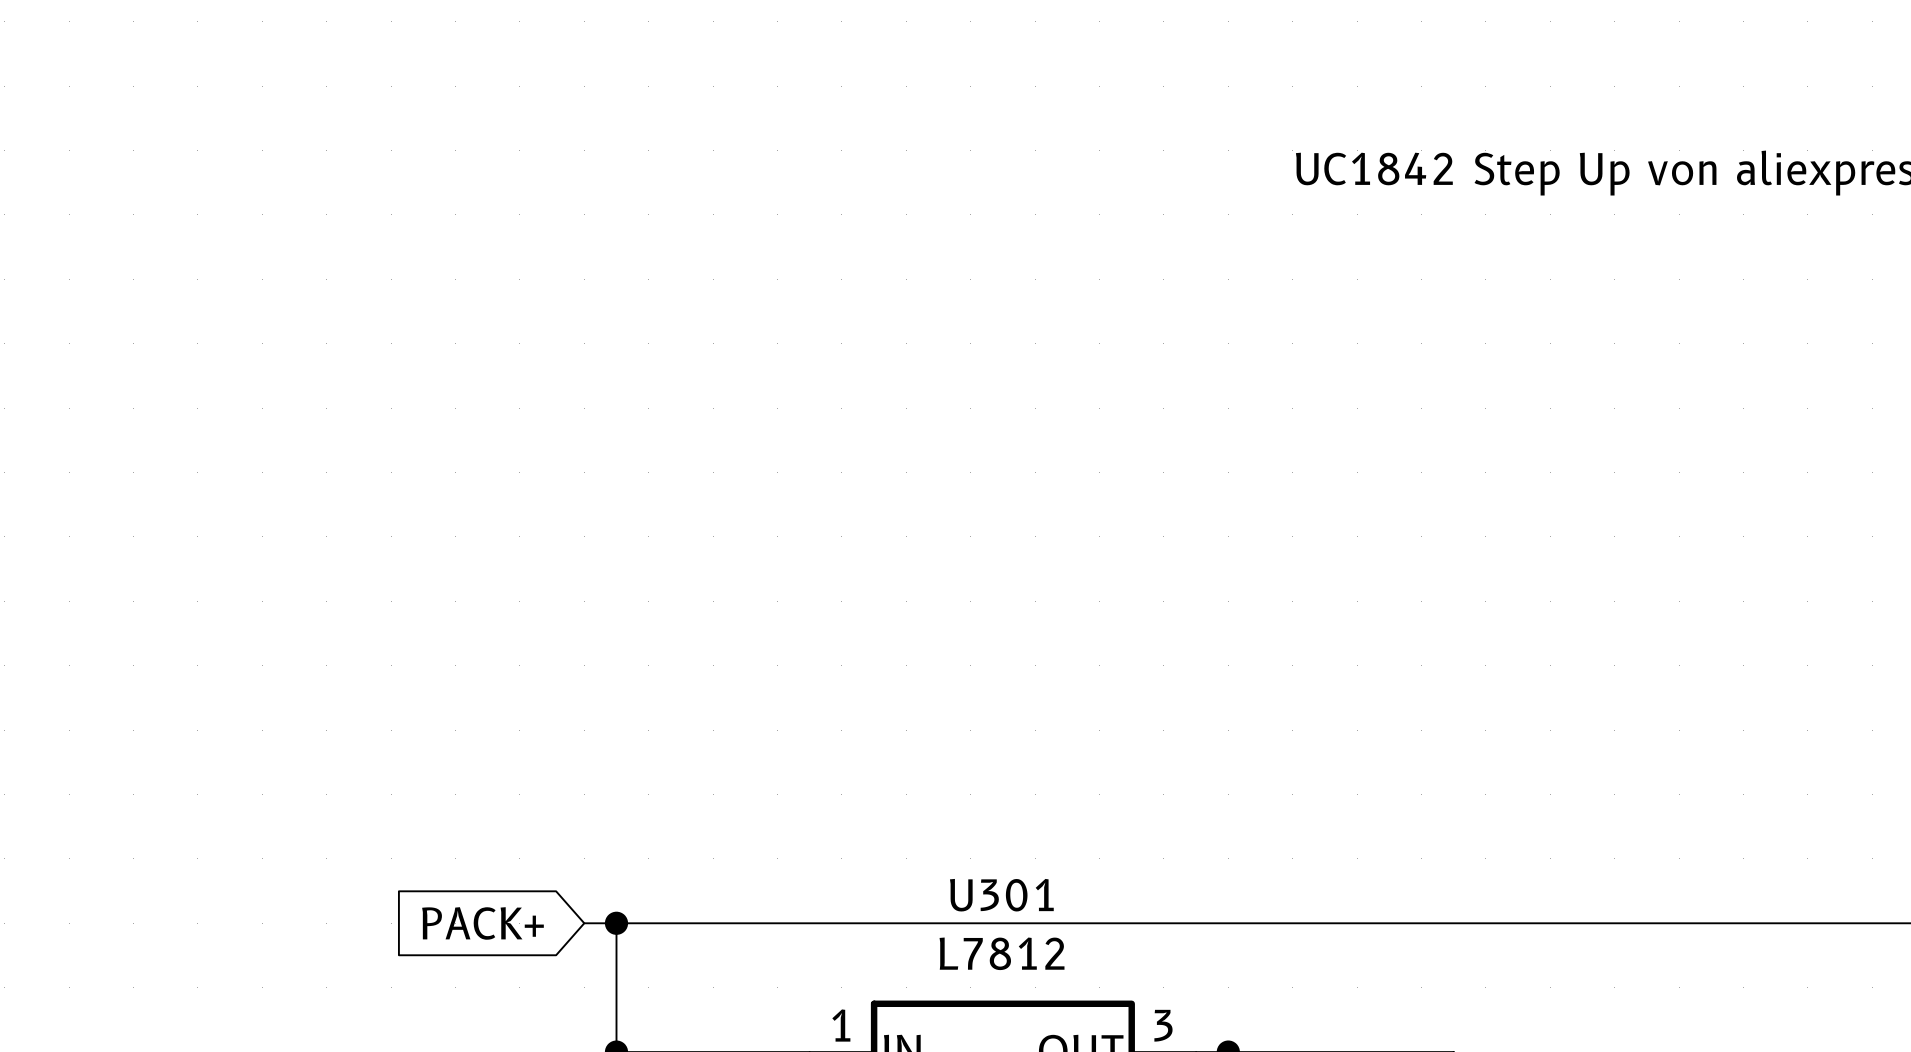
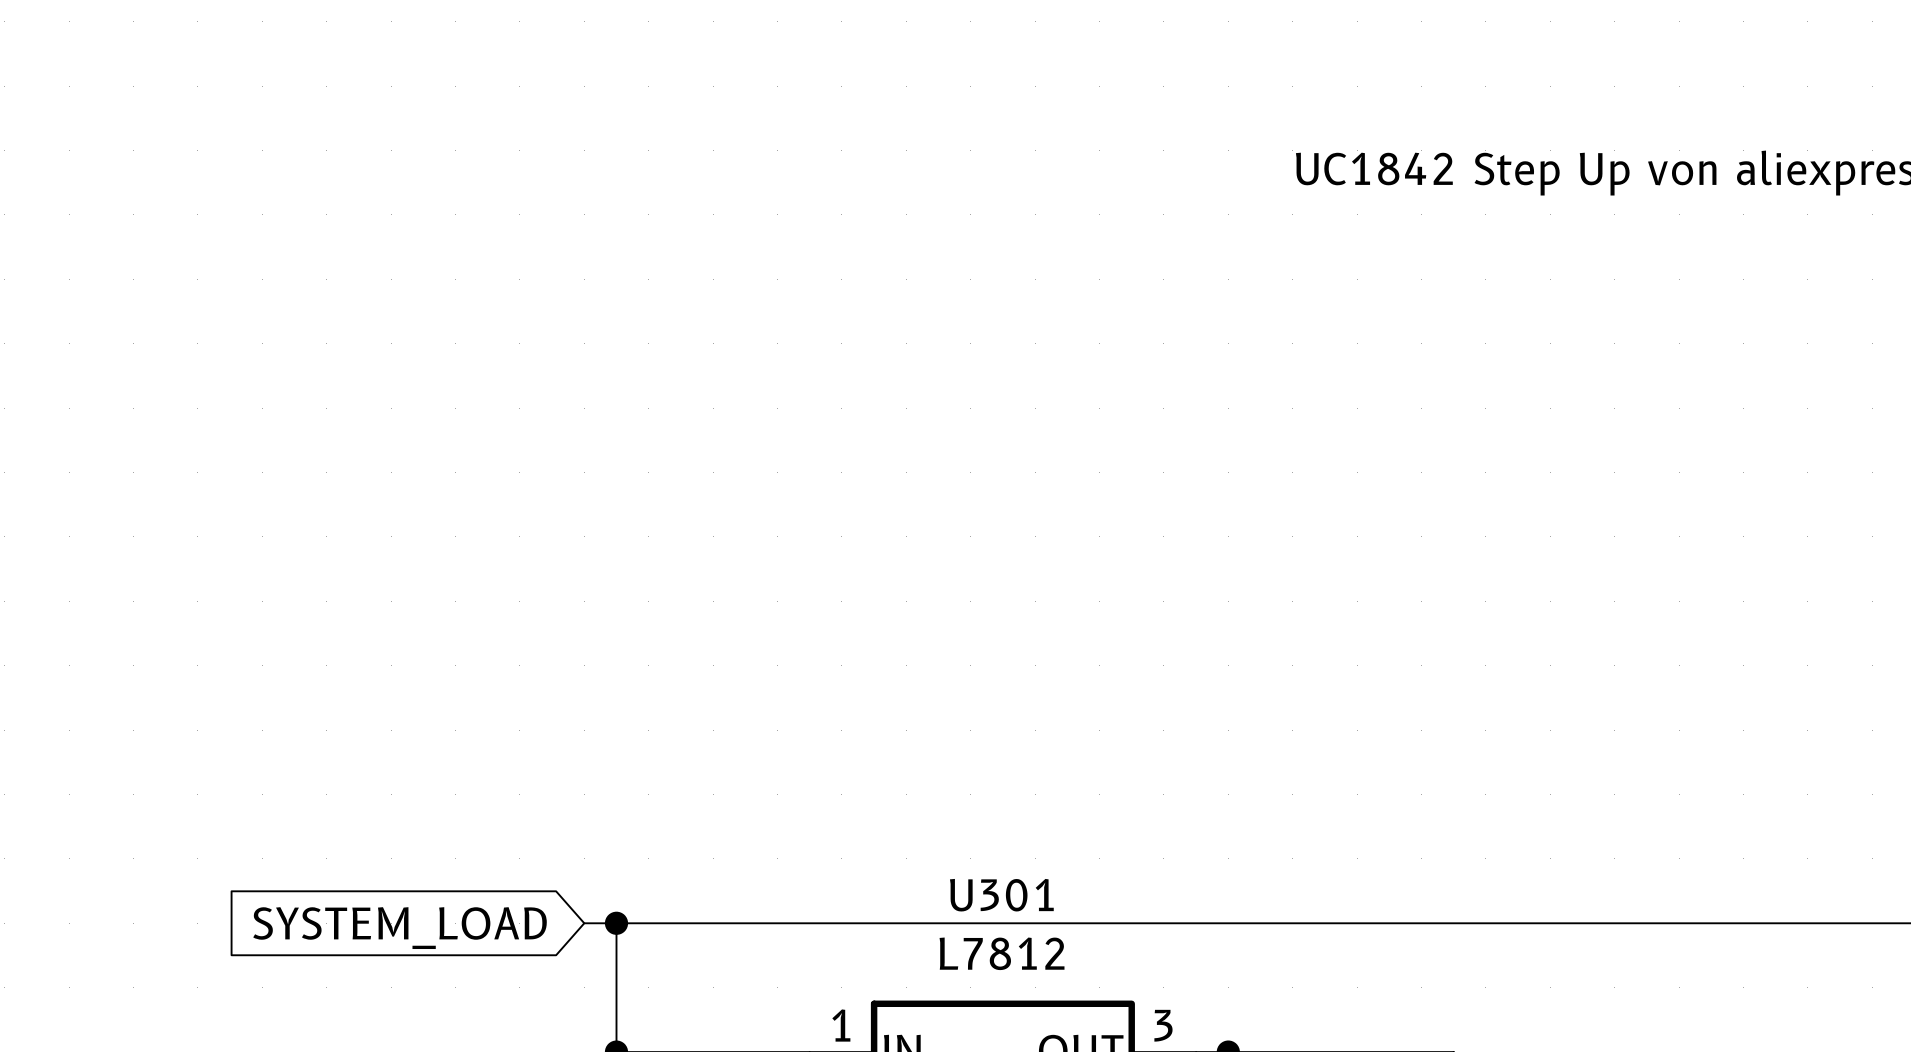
global label: PACK+ (482, 923) -> SYSTEM_LOAD (400, 928)

